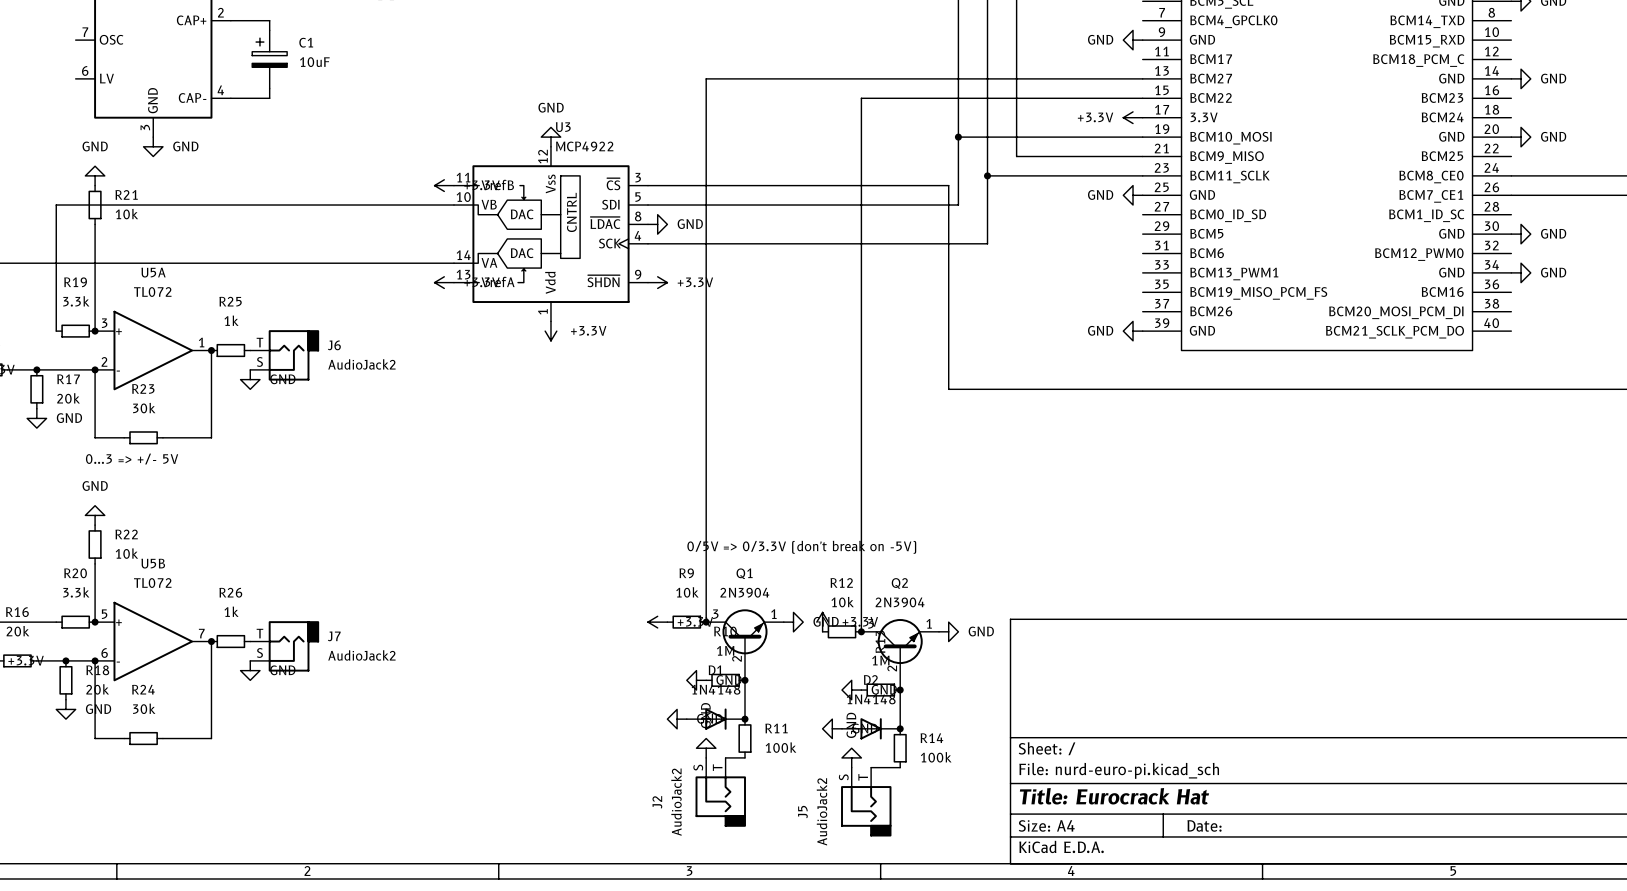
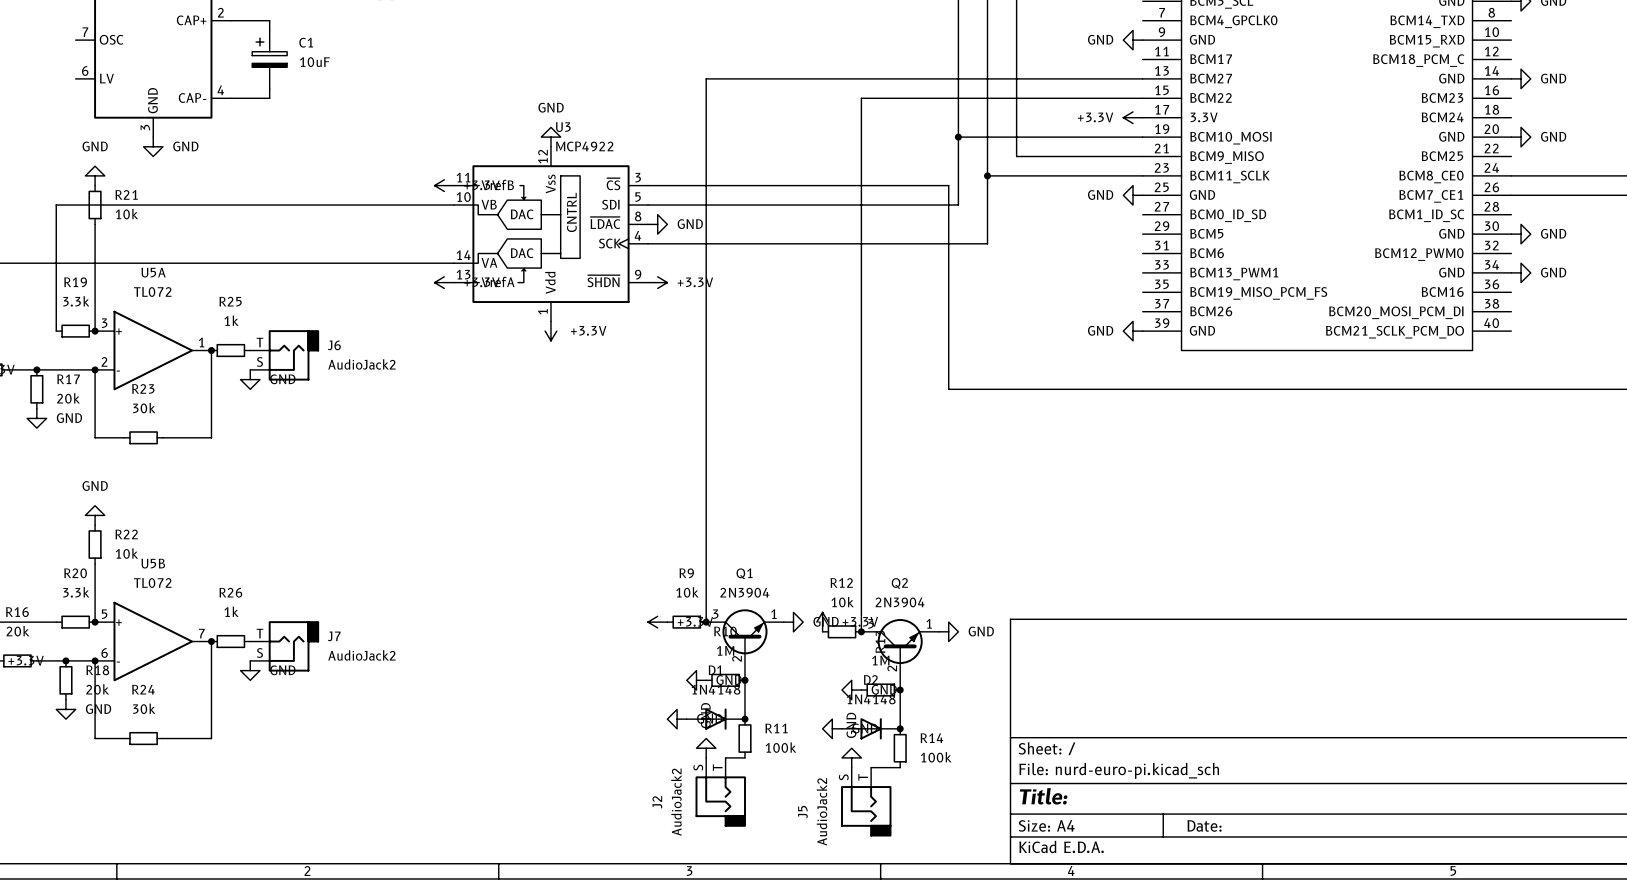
text: 0...3 => +/- 5V (132, 459) -> none
text: 0/5V => 0/3.3V (don't break on -5V) (801, 547) -> none
title block: Title: Eurocrack Hat (1114, 796) -> Title: (1043, 796)

